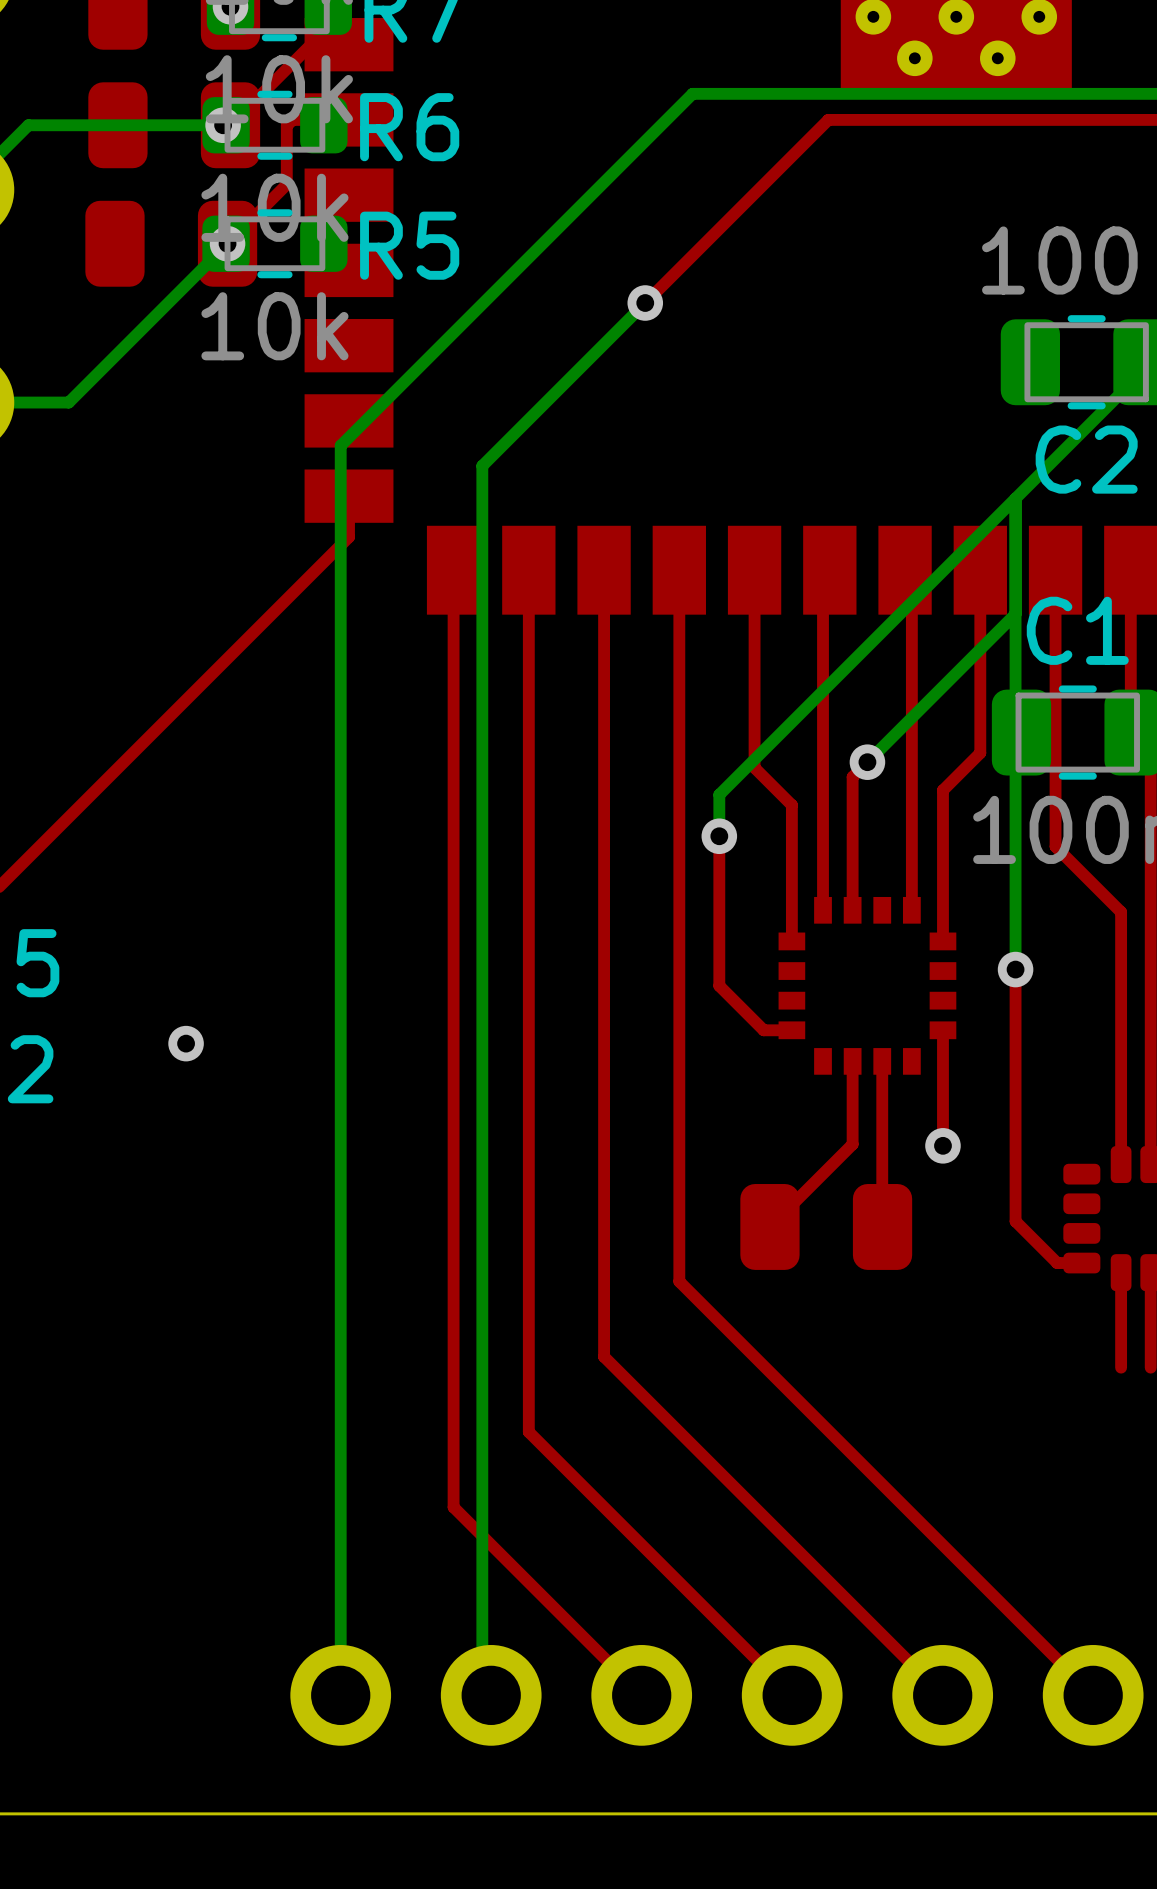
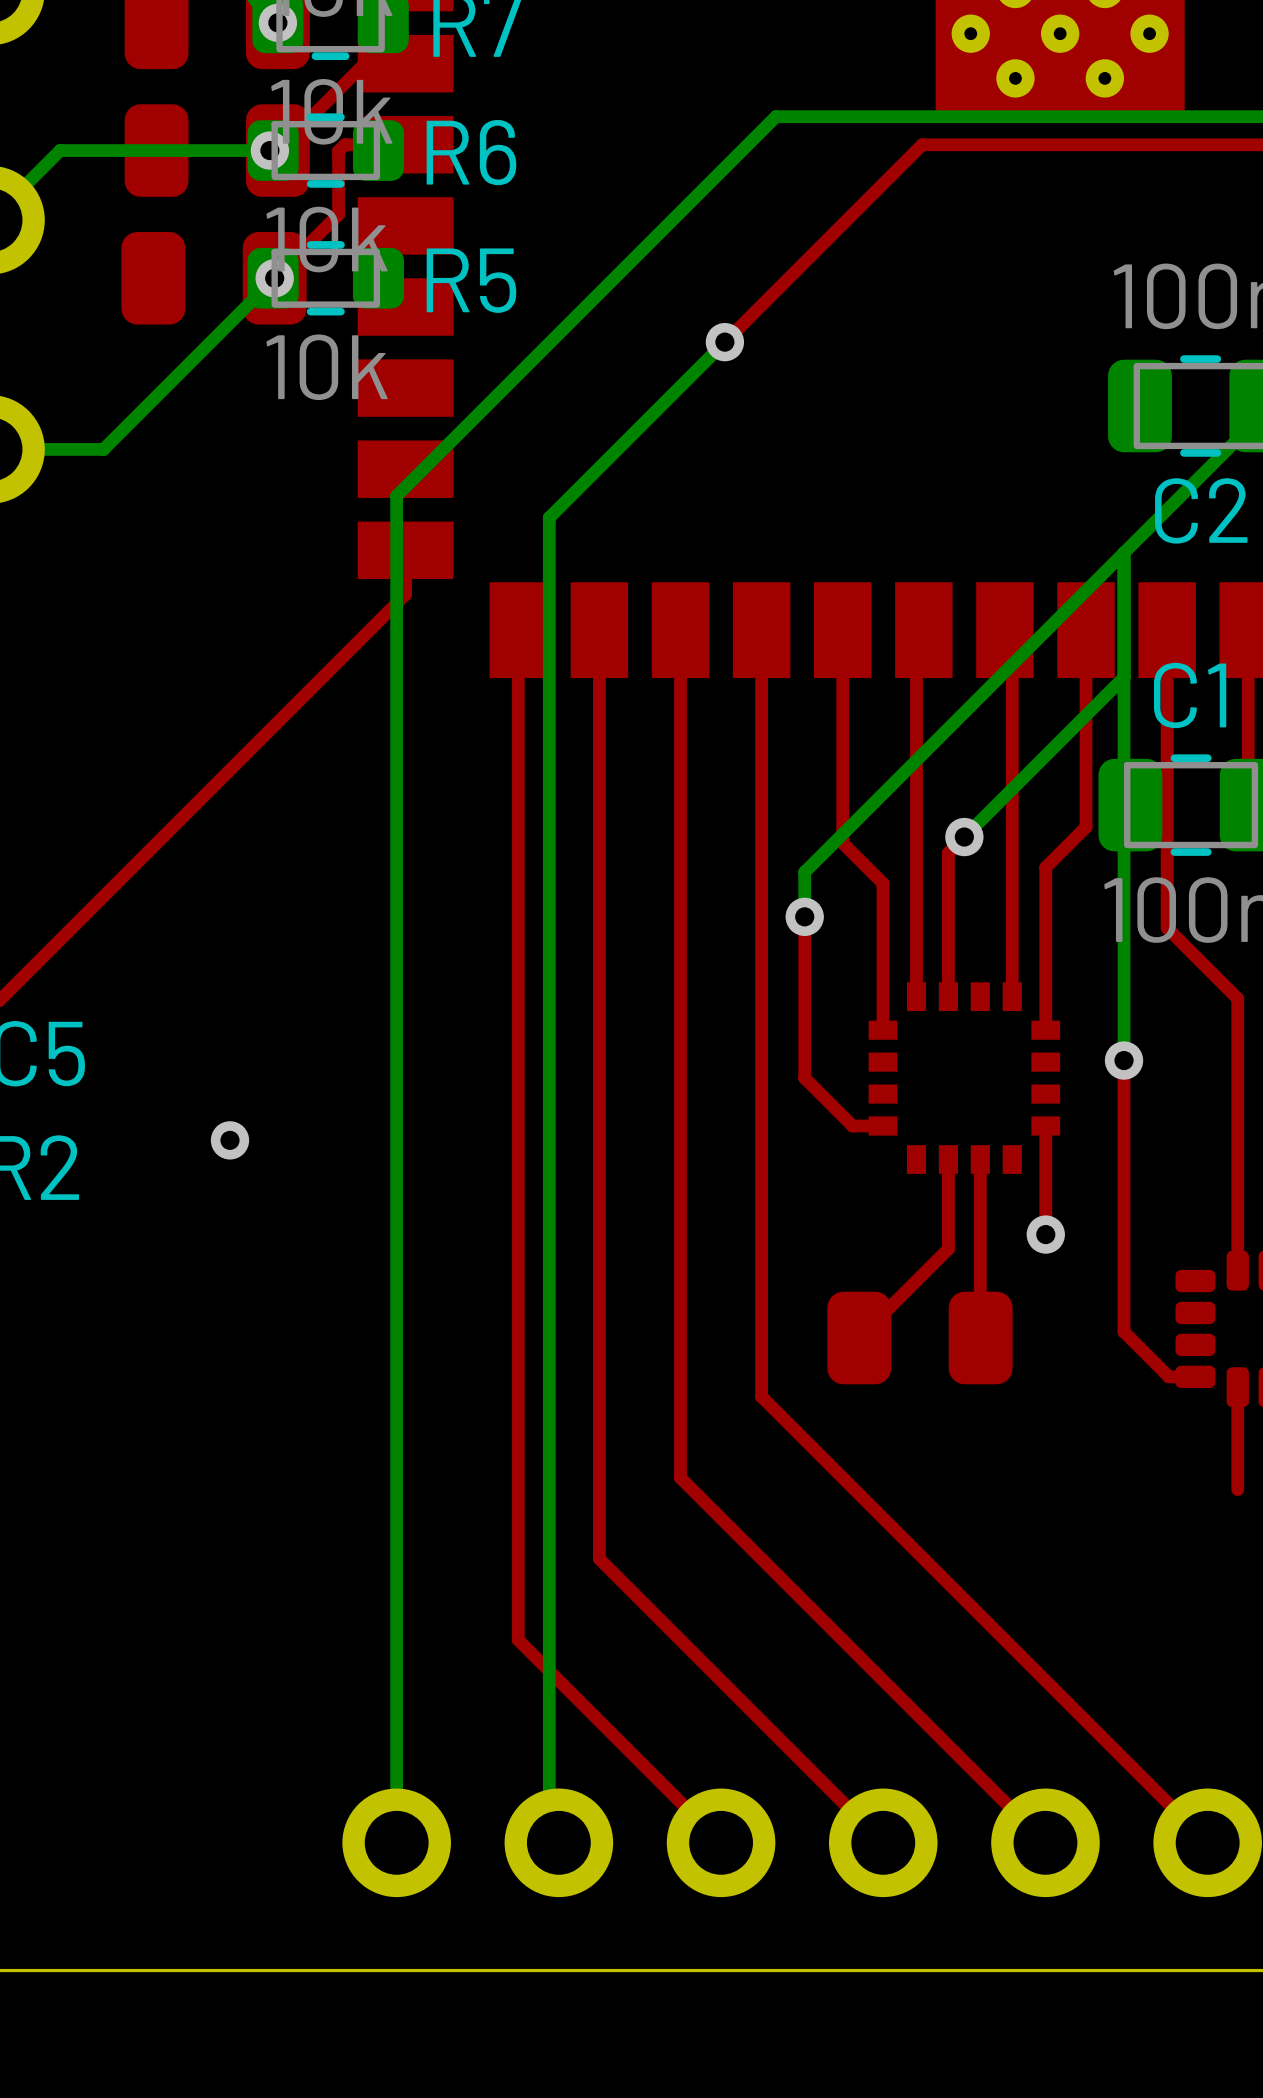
via position: (942, 1145) -> (1045, 1234)

